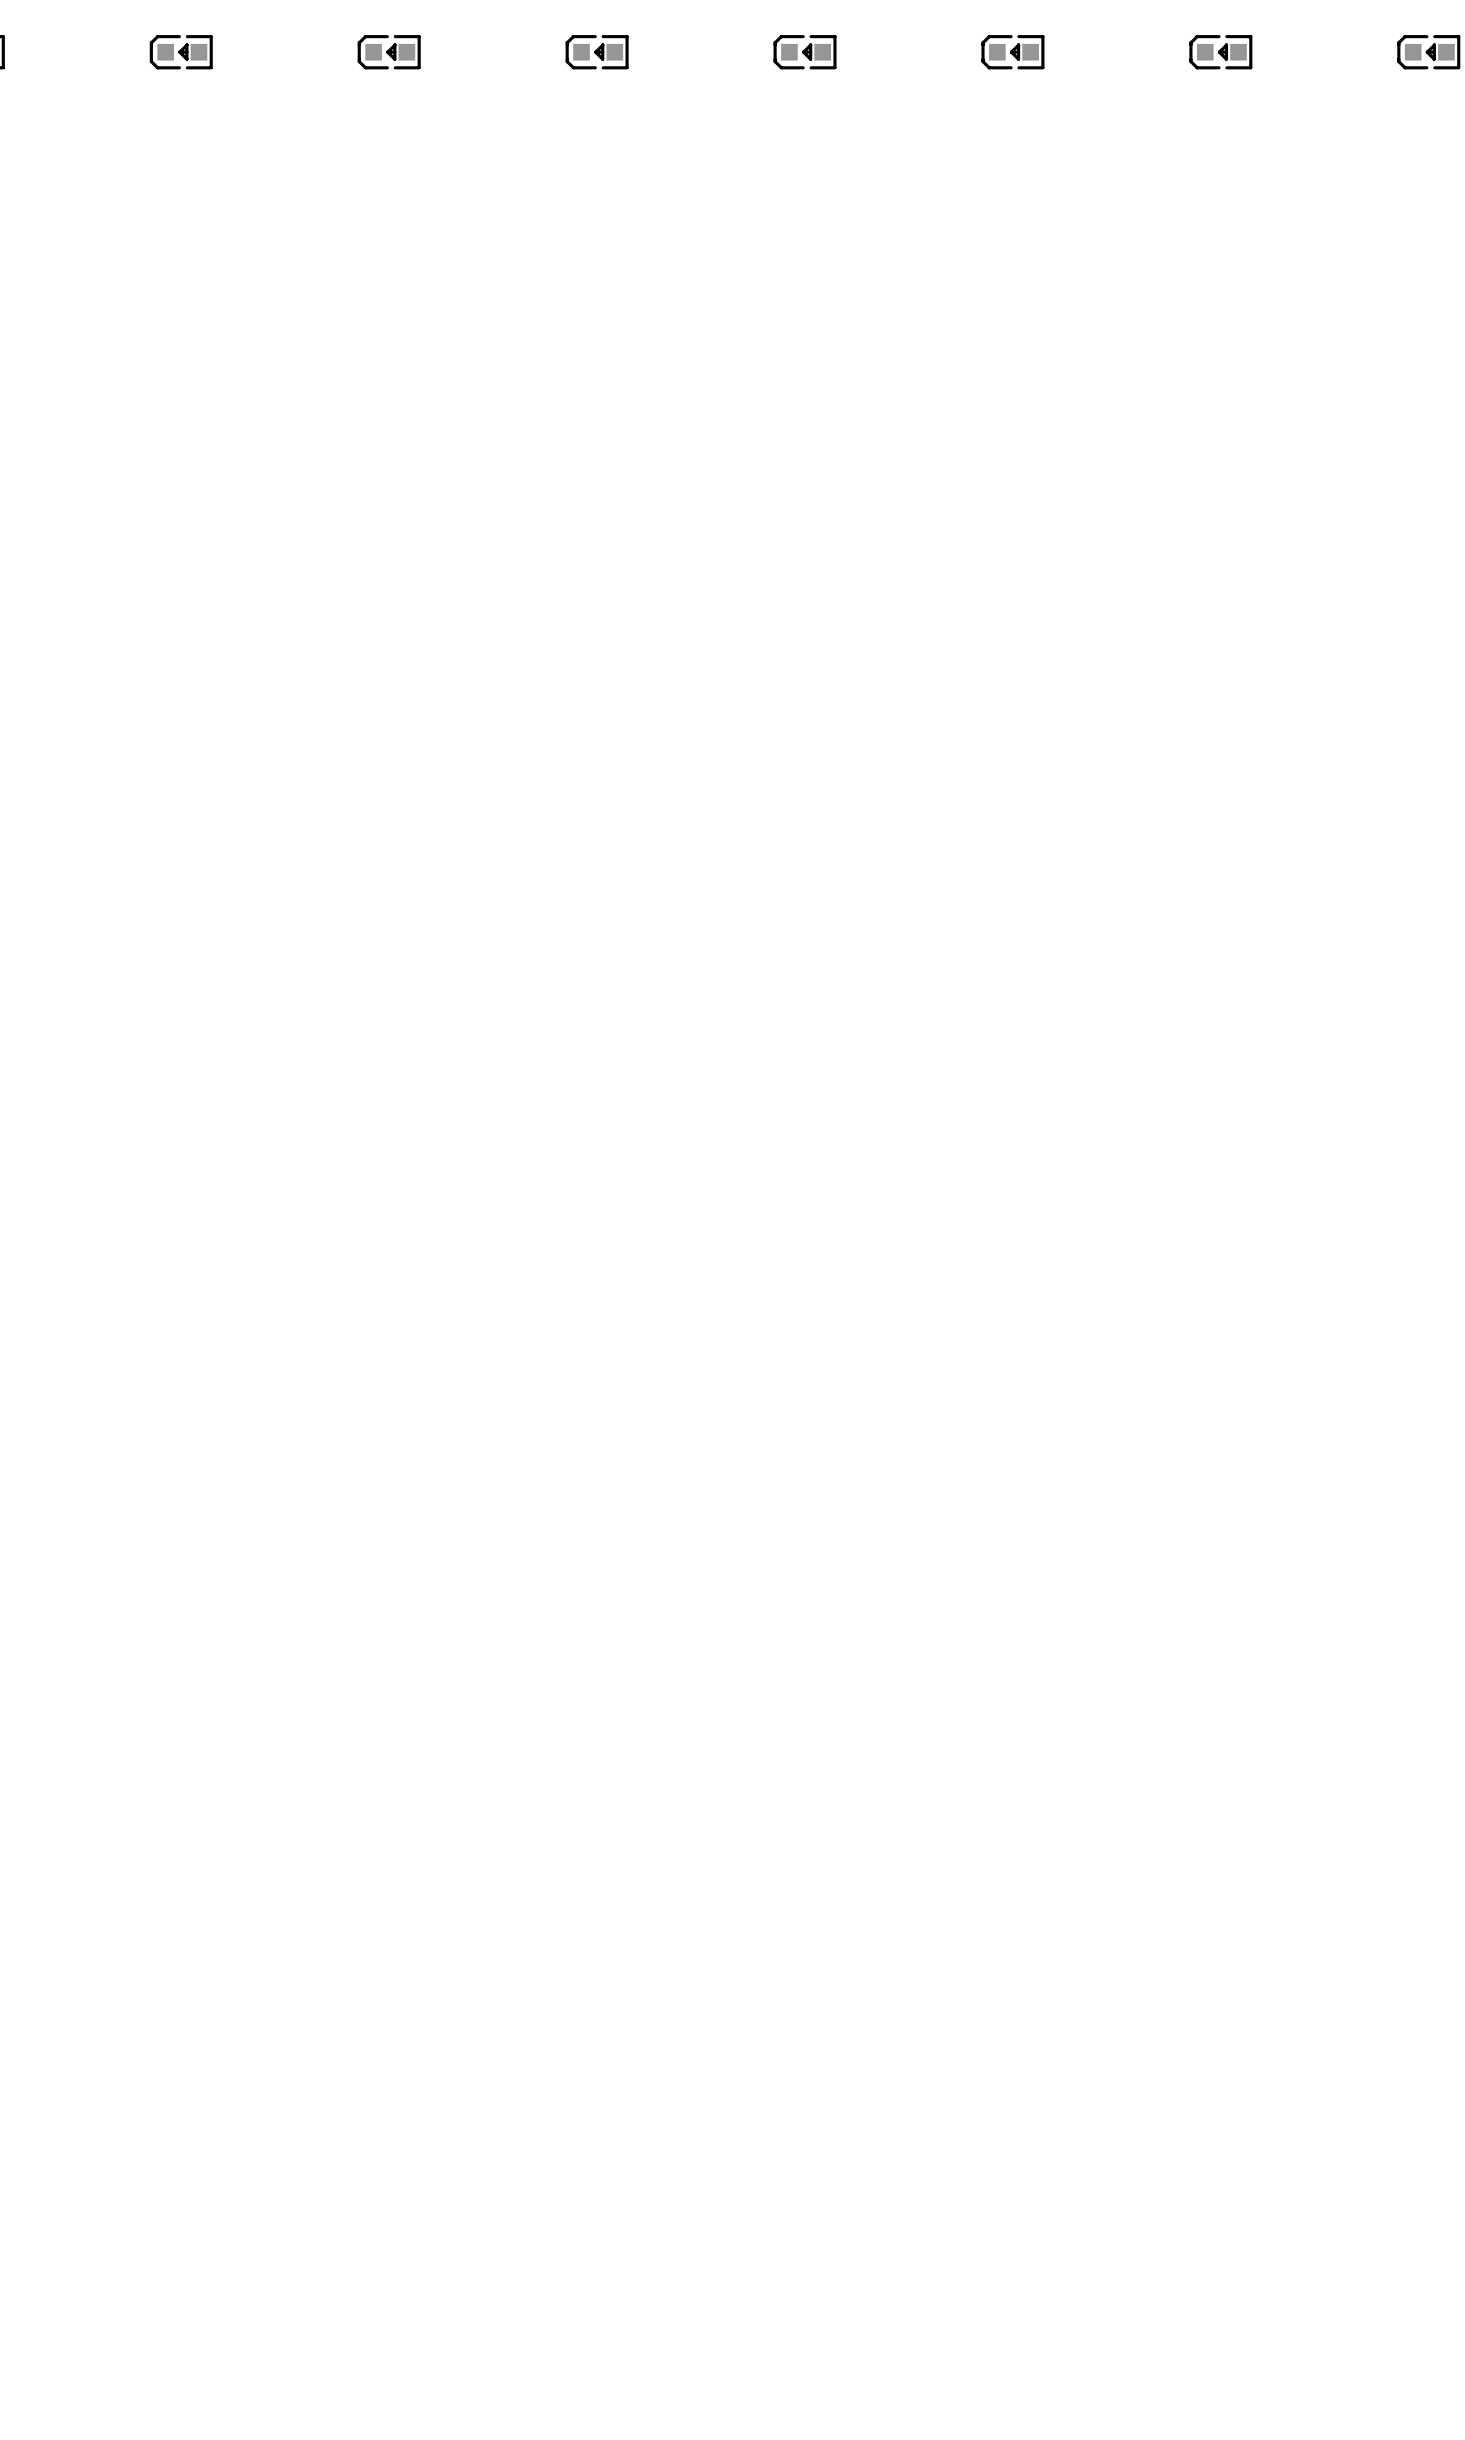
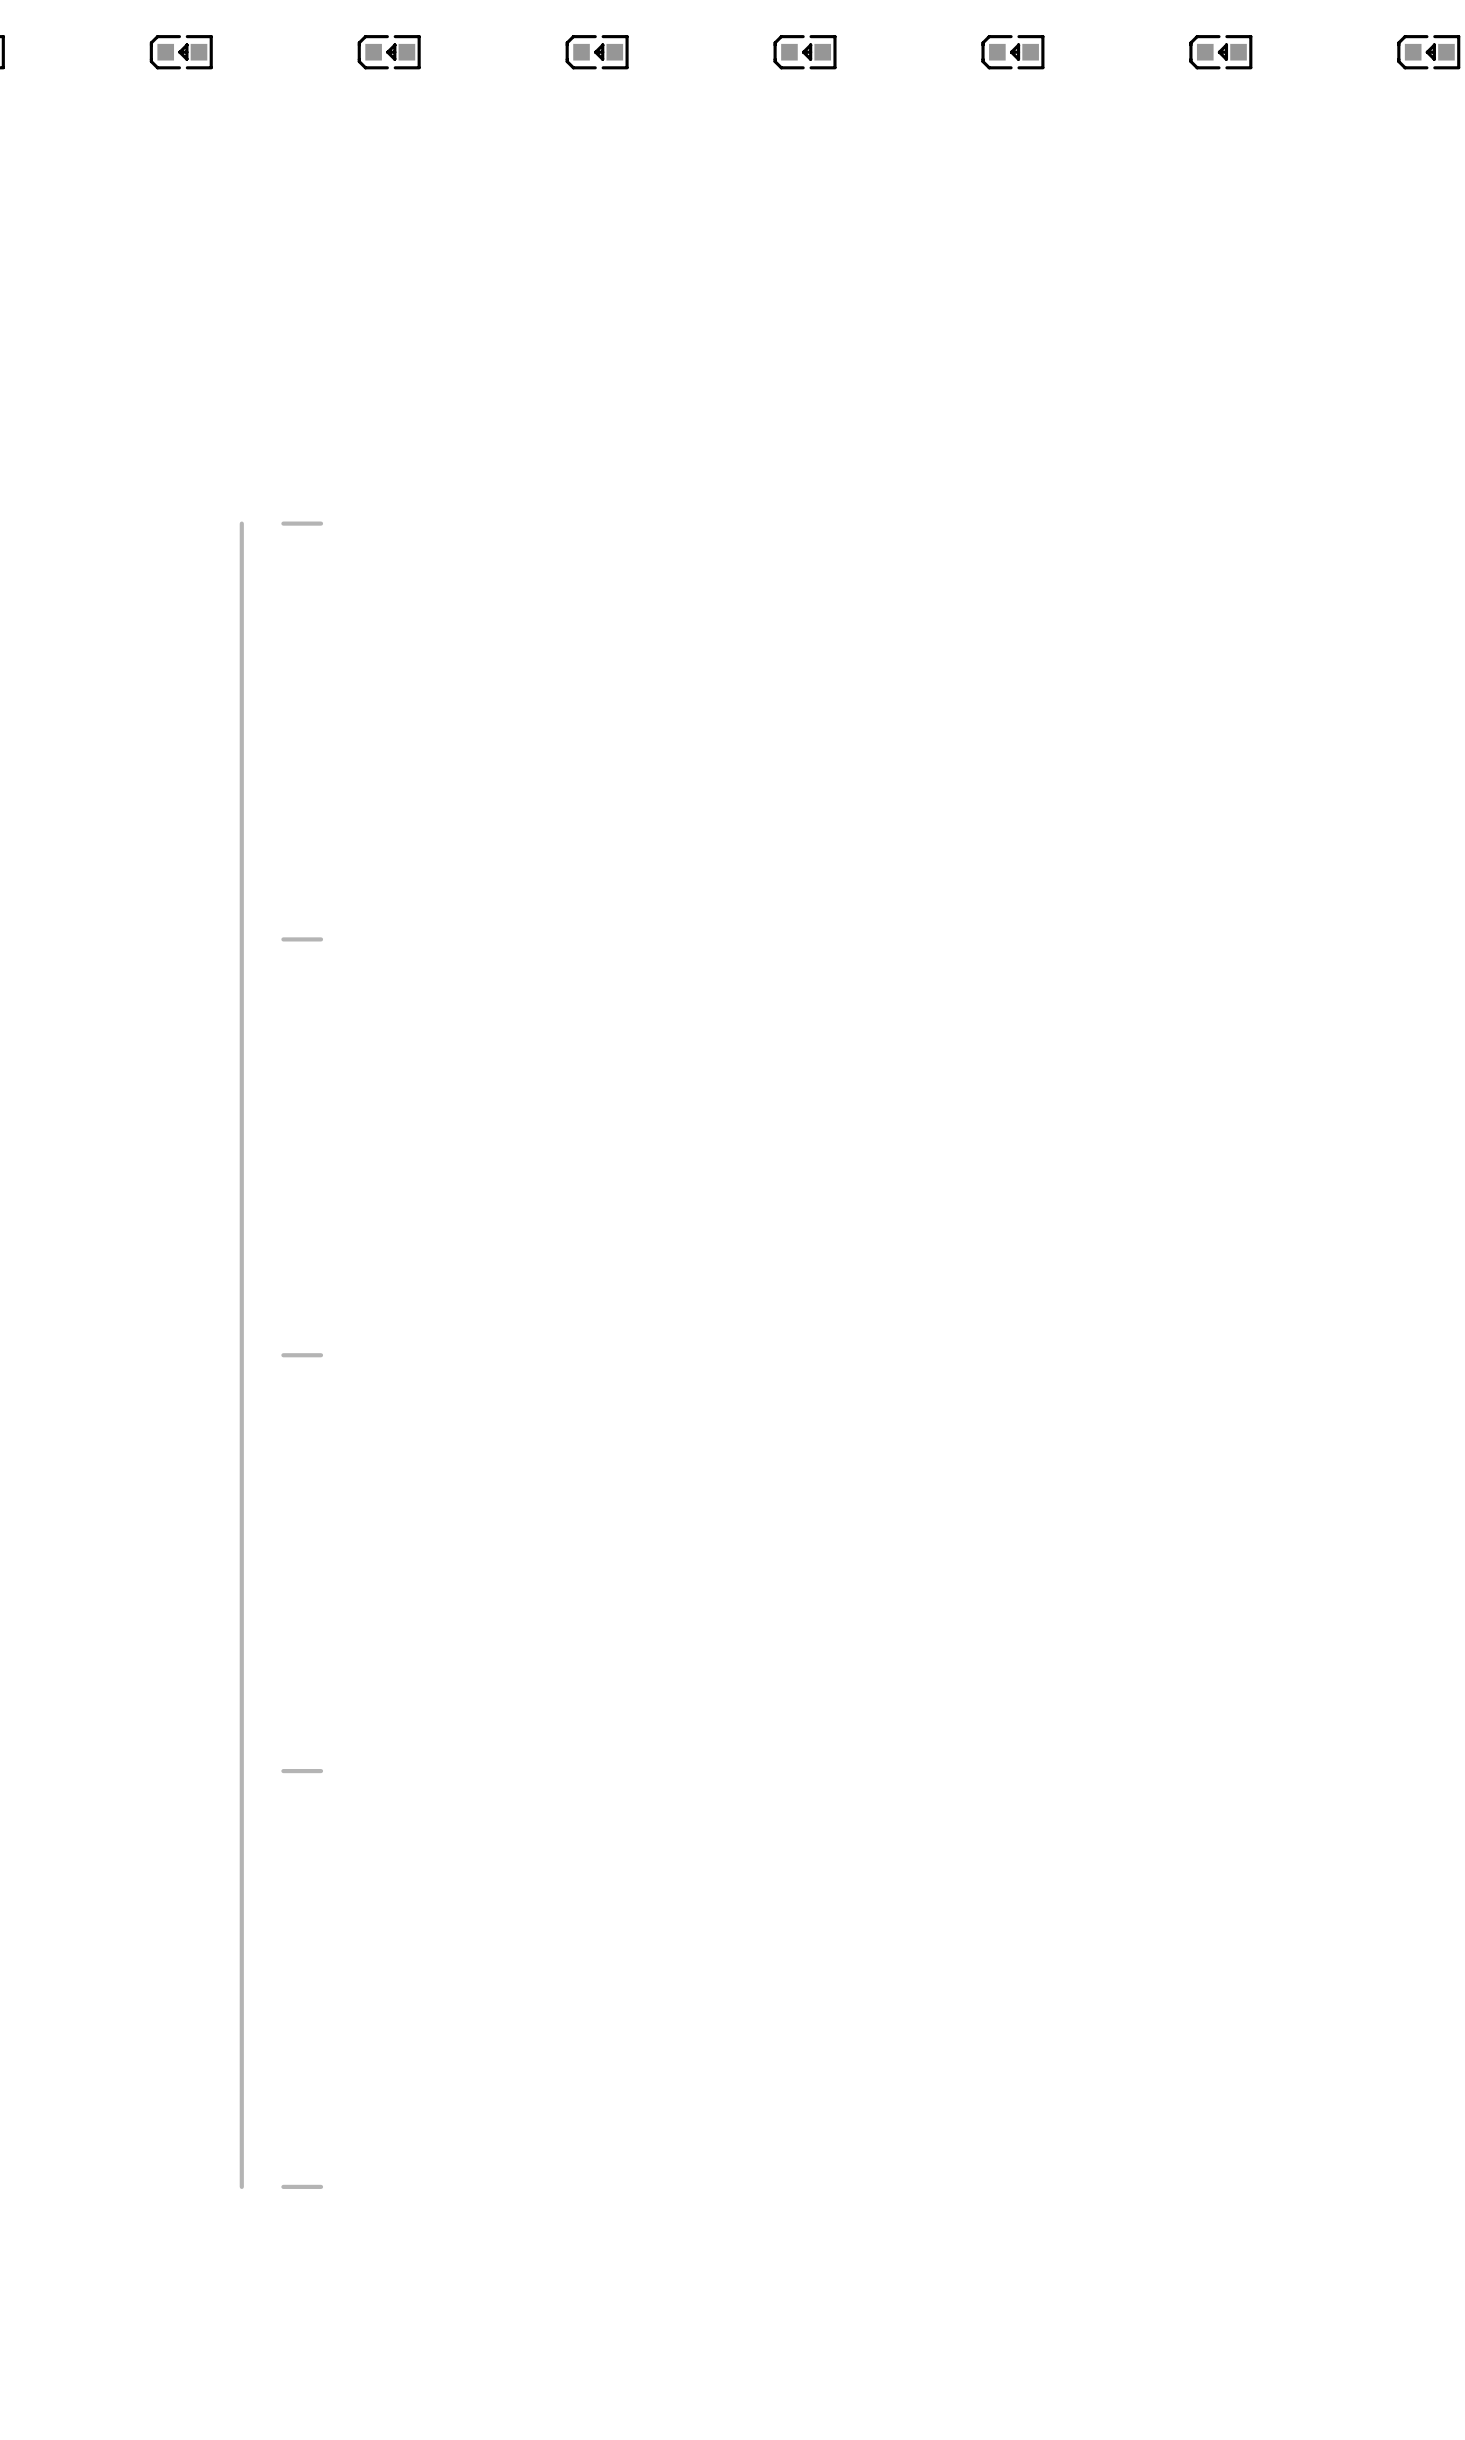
track: none -> (241, 523) (241, 2186)
track: none -> (283, 523) (321, 523)
track: none -> (283, 939) (321, 939)
track: none -> (283, 1355) (321, 1355)
track: none -> (283, 1771) (321, 1771)
track: none -> (283, 2186) (321, 2186)

